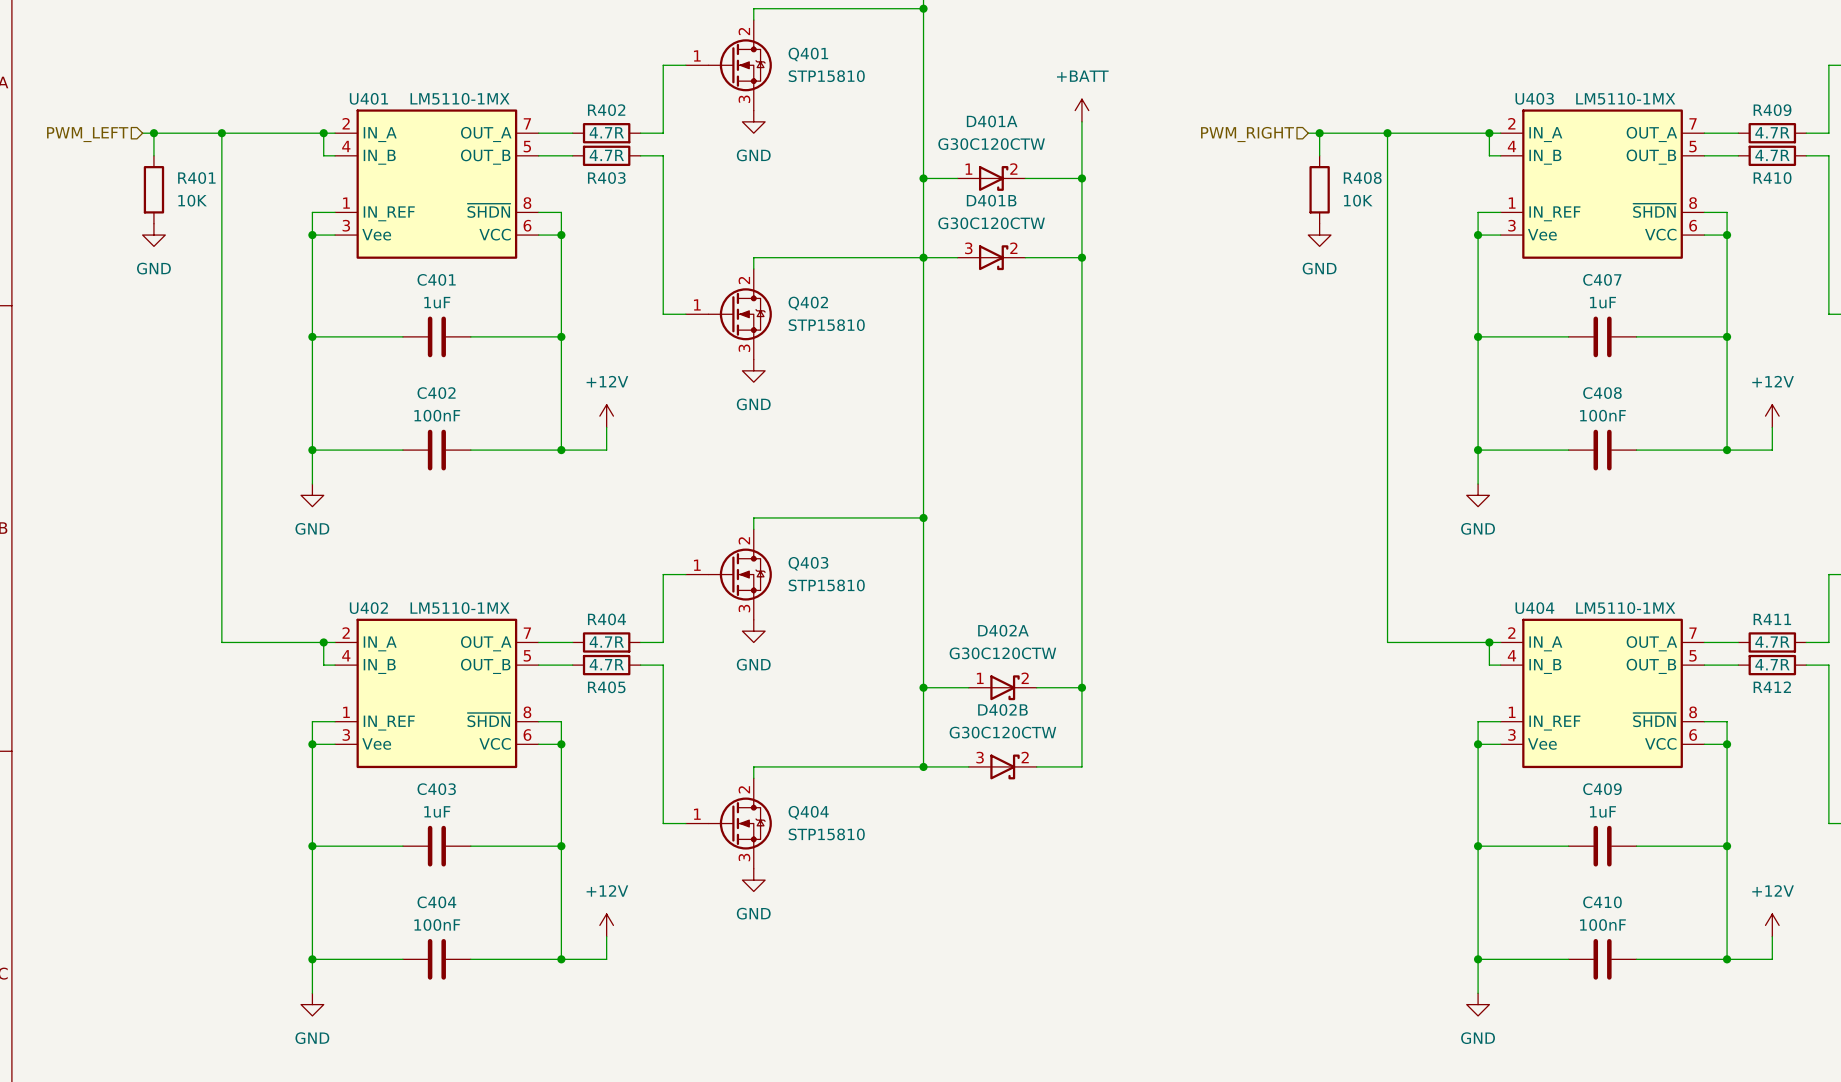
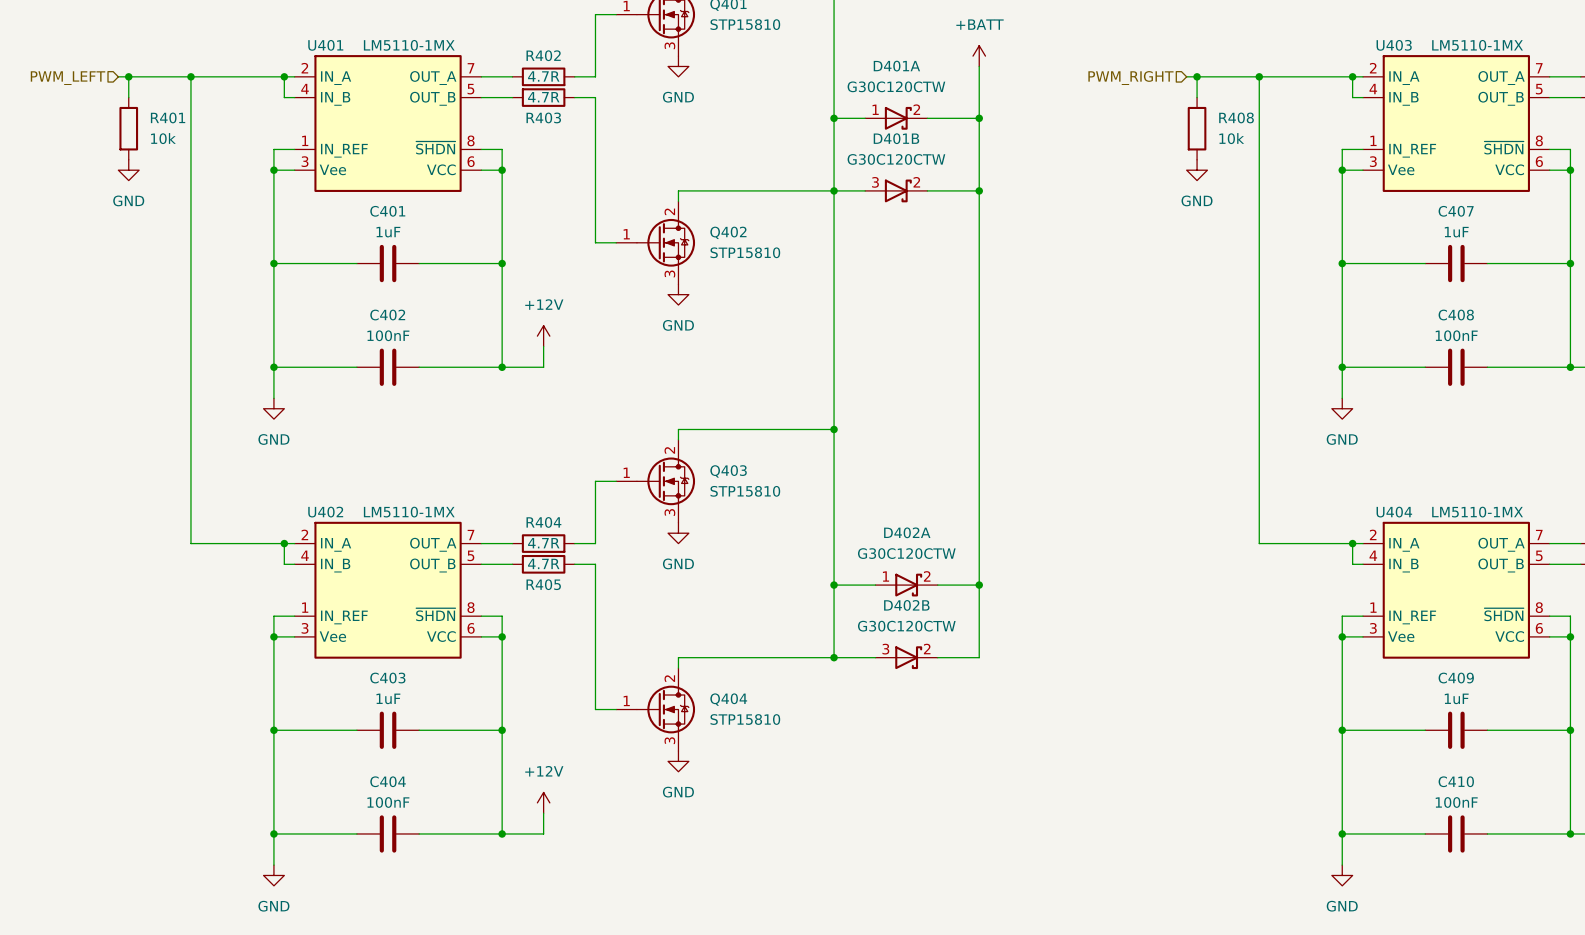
R401 value: 10K (192, 200) -> 10k (163, 138)
R408 value: 10K (1358, 200) -> 10k (1231, 138)

